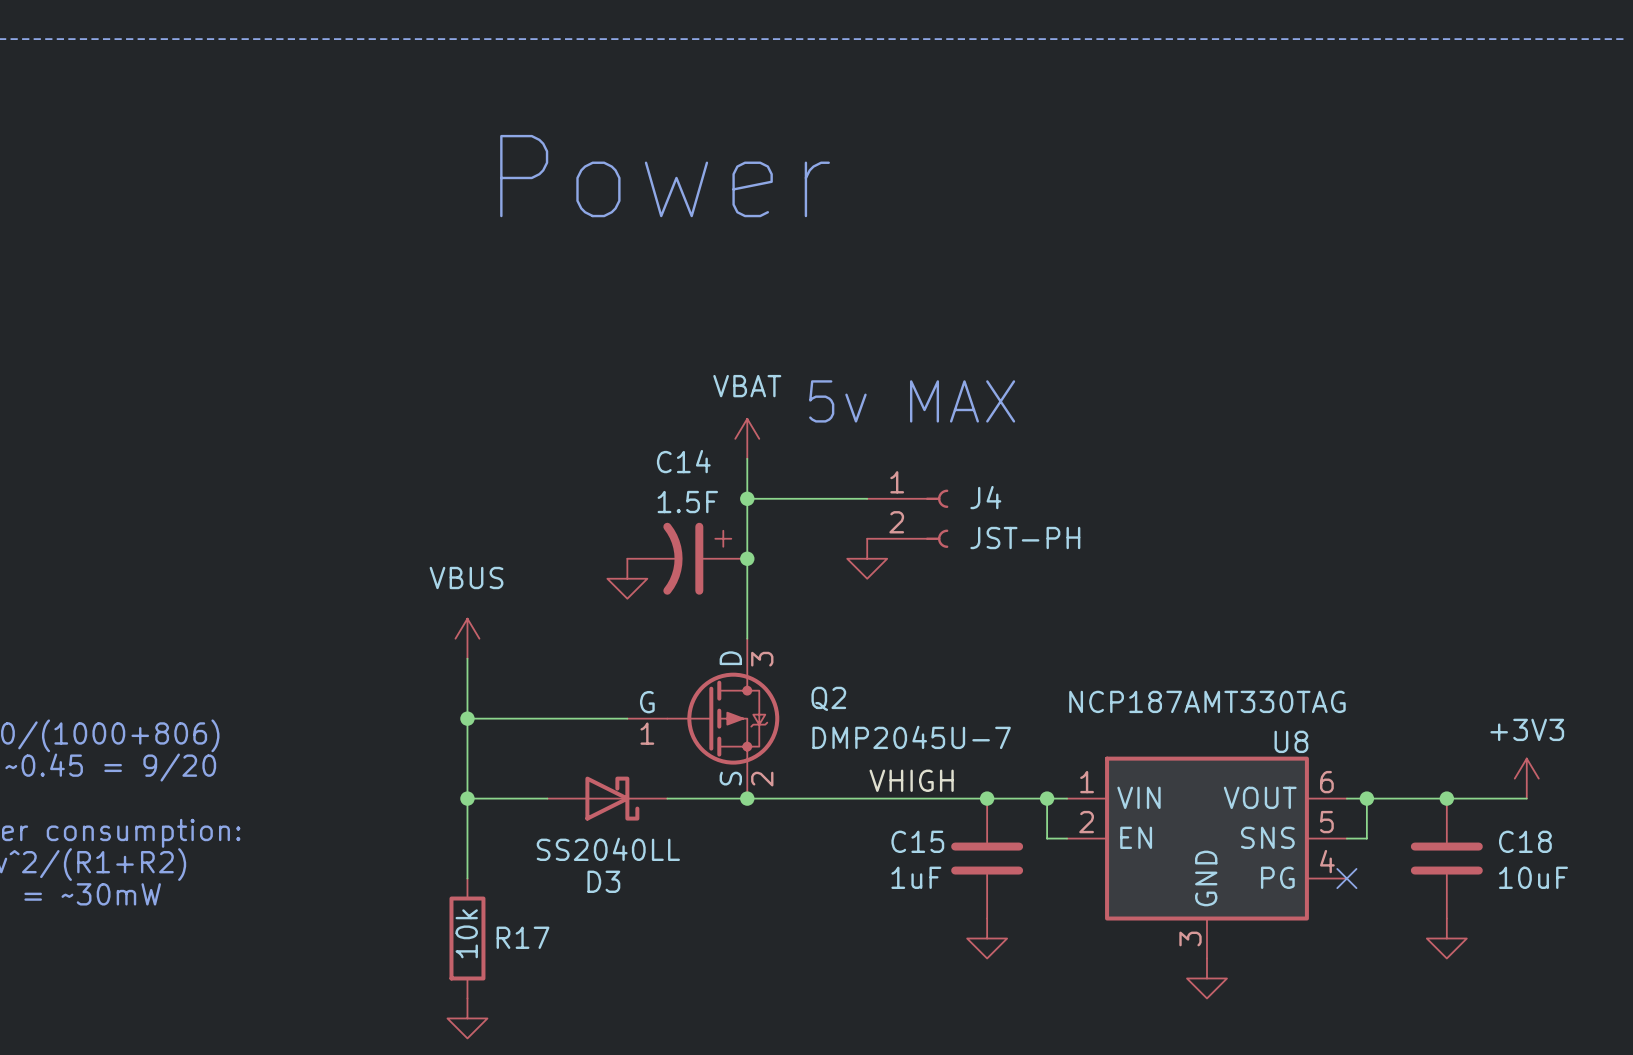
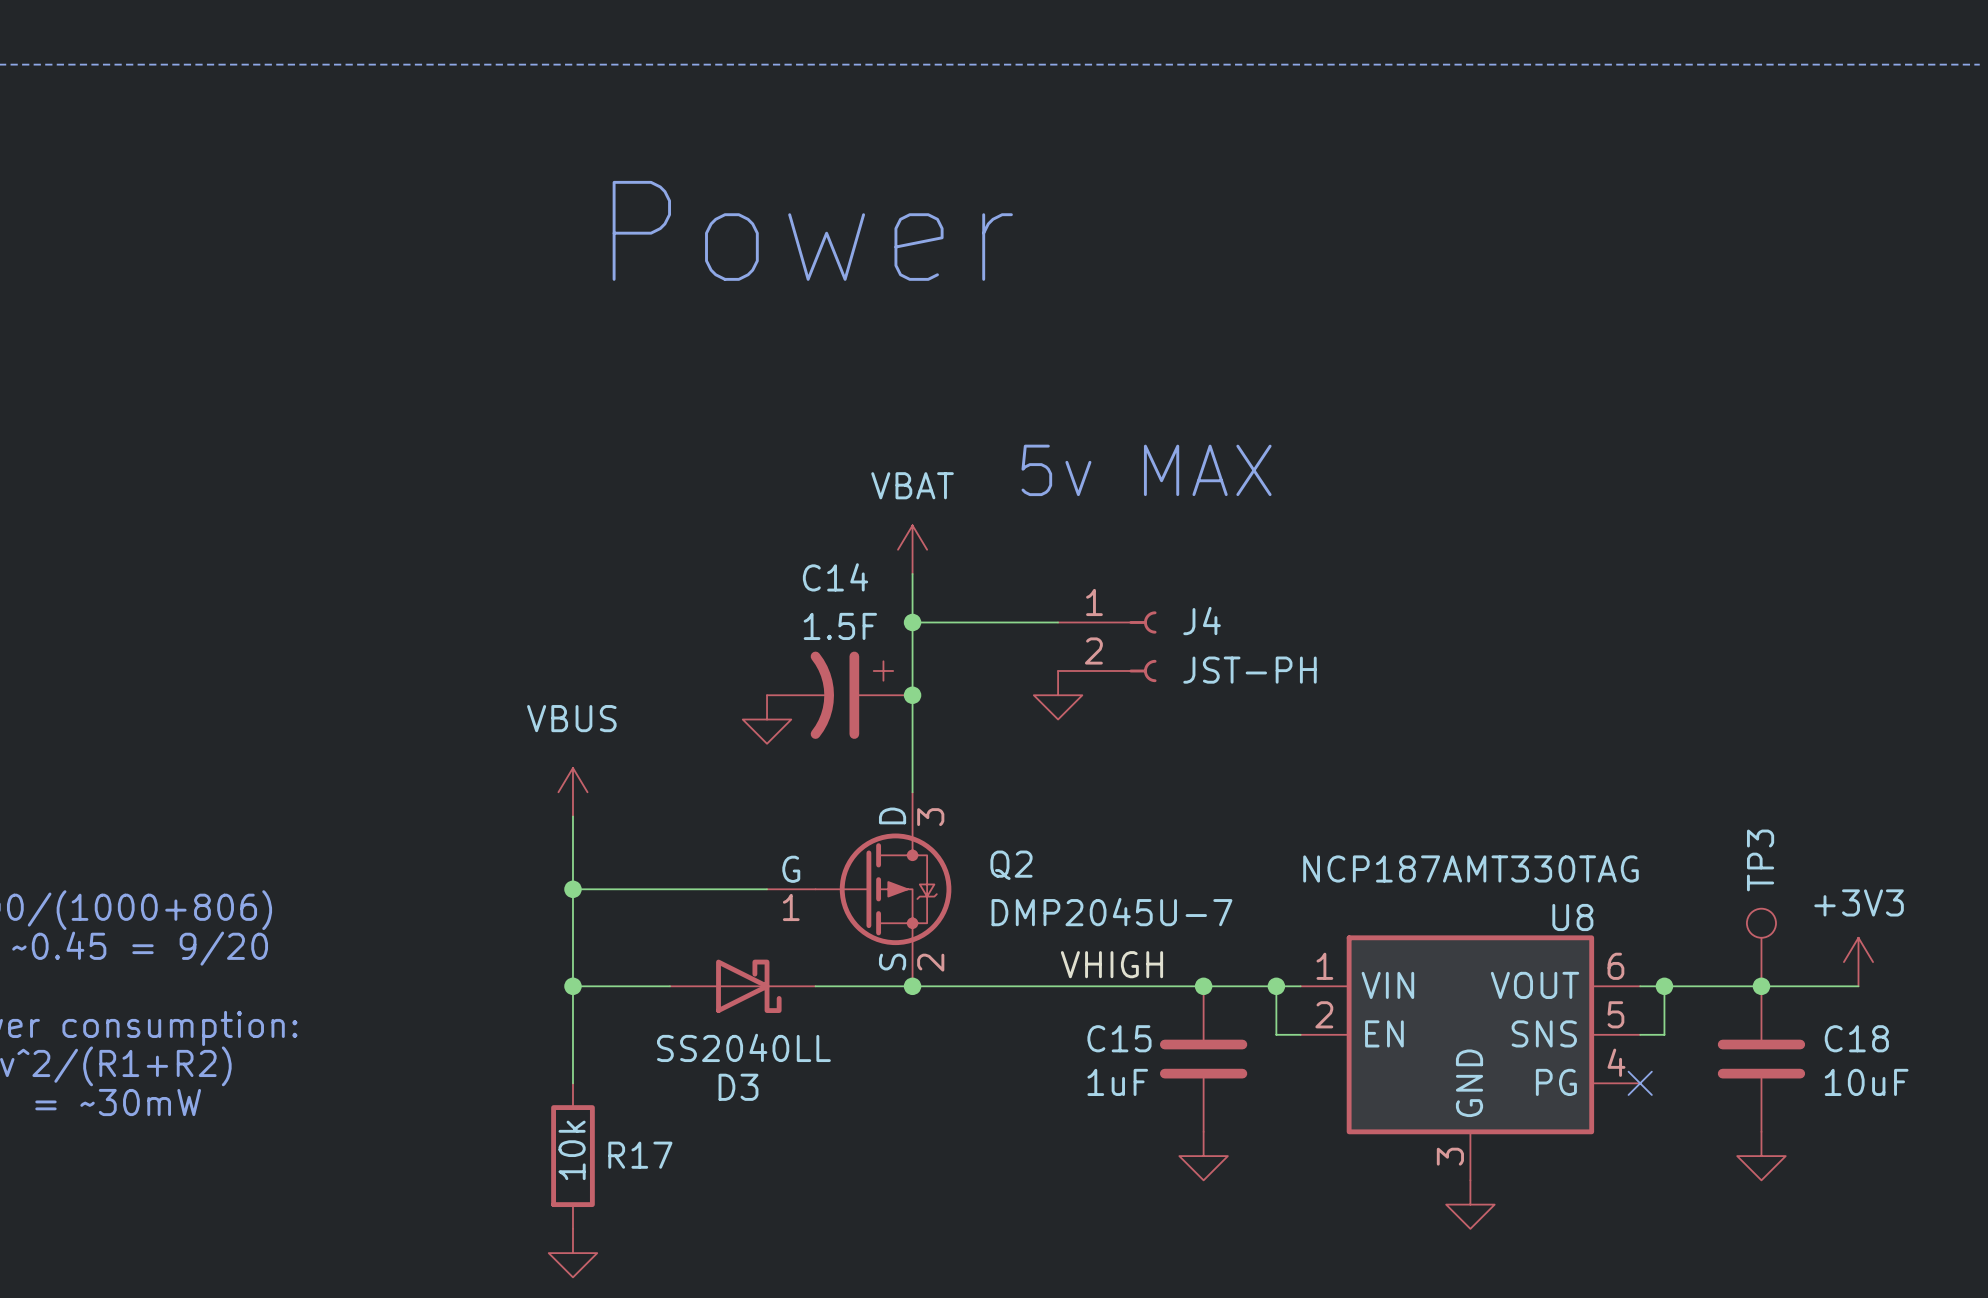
text position: 5v MAX (912, 401) -> 5v MAX (1146, 470)
TP3: none -> (1761, 947)

